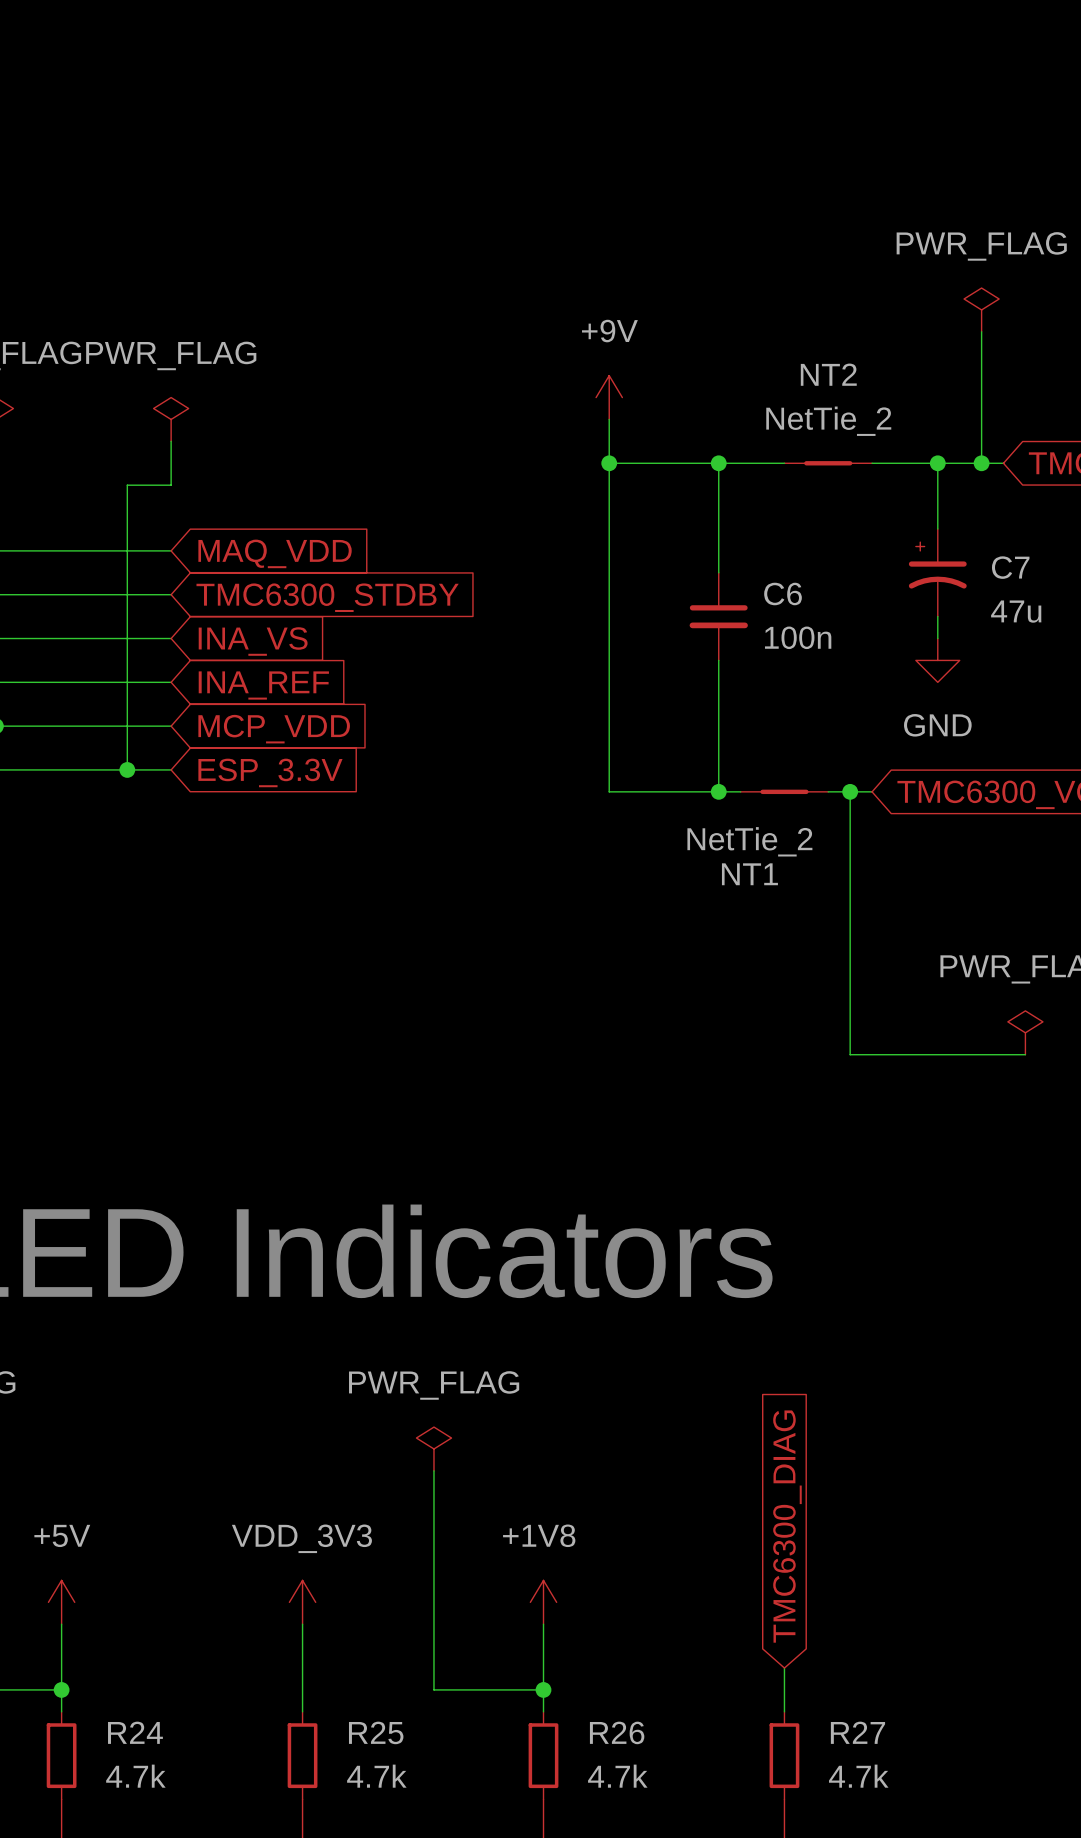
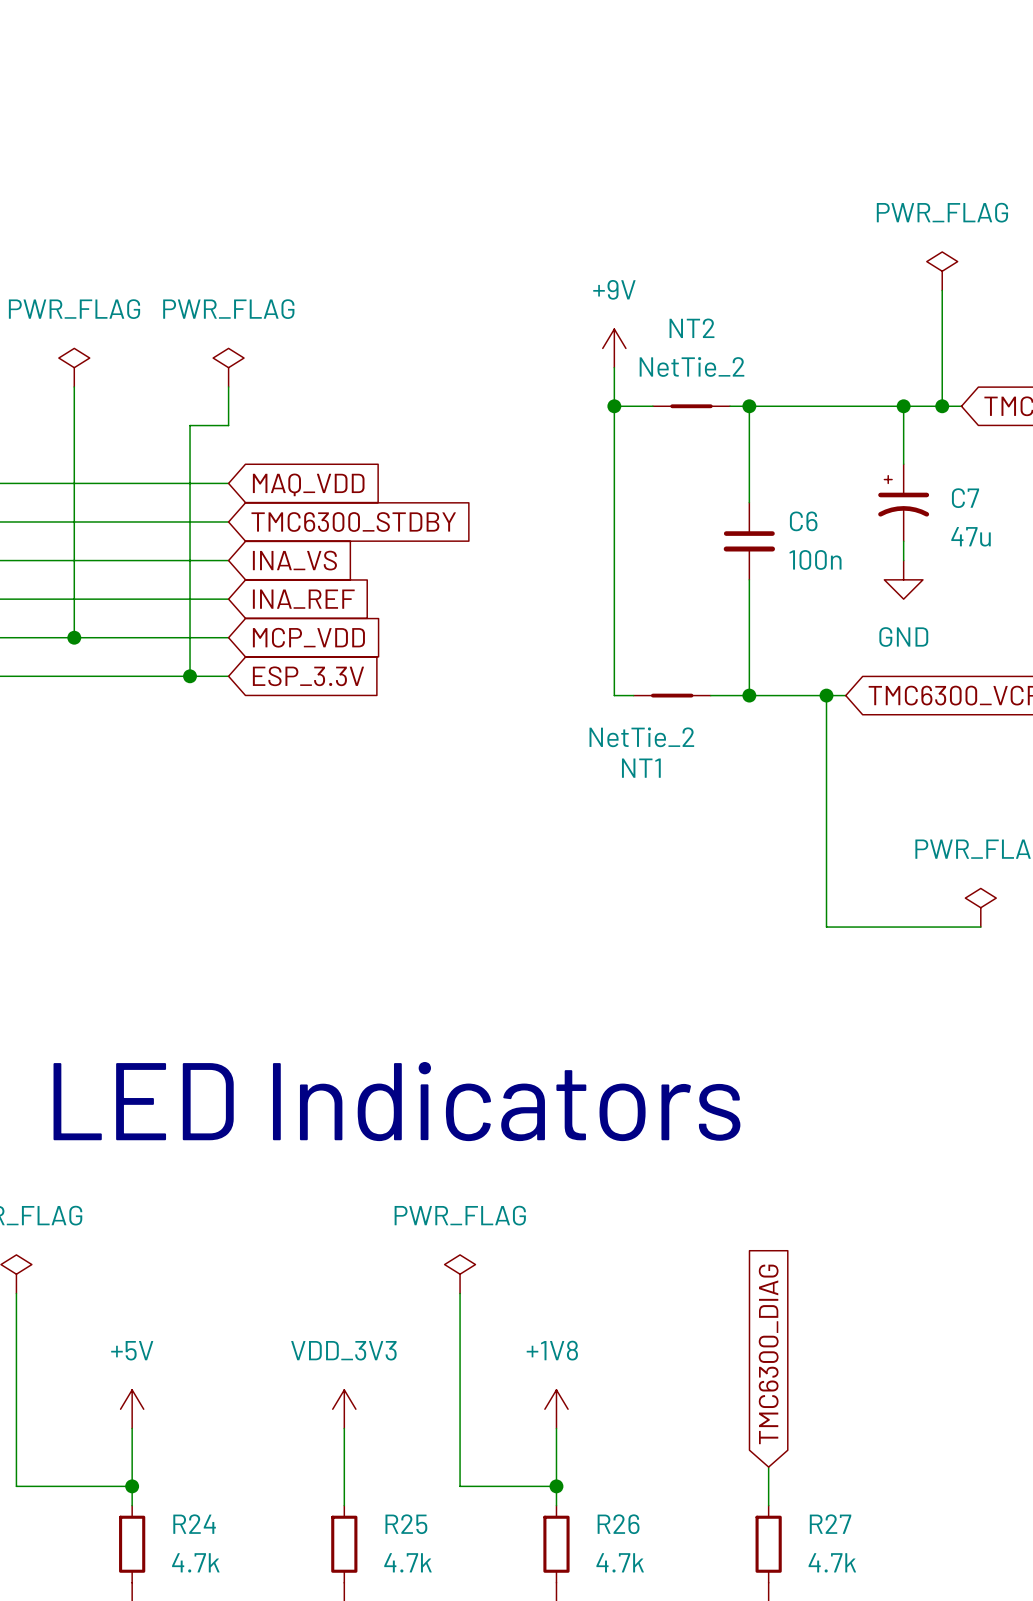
wire: (718, 463) (718, 572) -> (749, 406) (749, 502)
junction position: (718, 463) -> (749, 406)
NT2 position: (828, 463) -> (691, 406)
C6 position: (718, 616) -> (749, 541)
wire: (718, 660) (718, 791) (631, 791) -> none
wire: none -> (749, 579) (749, 695)
junction position: (718, 791) -> (749, 695)
NT1 position: (784, 791) -> (672, 695)

